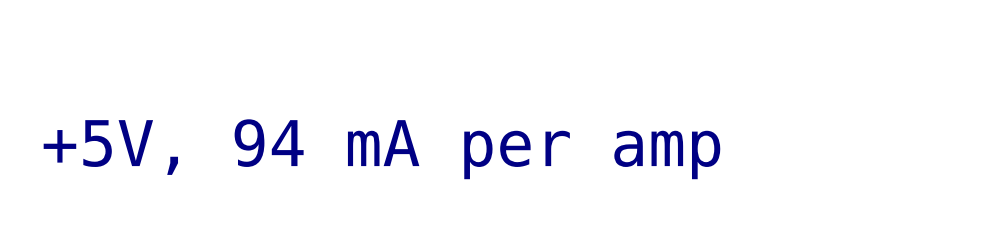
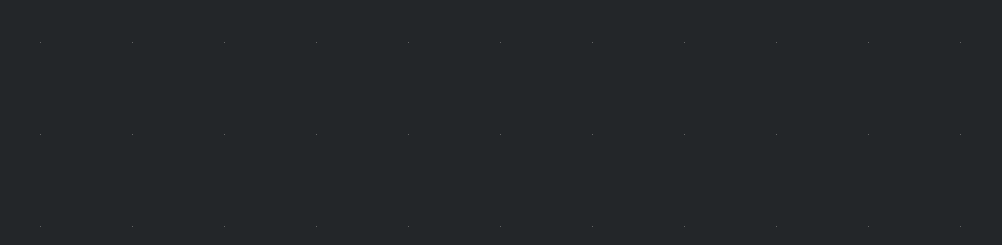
text: +5V, 94 mA per amp (381, 149) -> none

